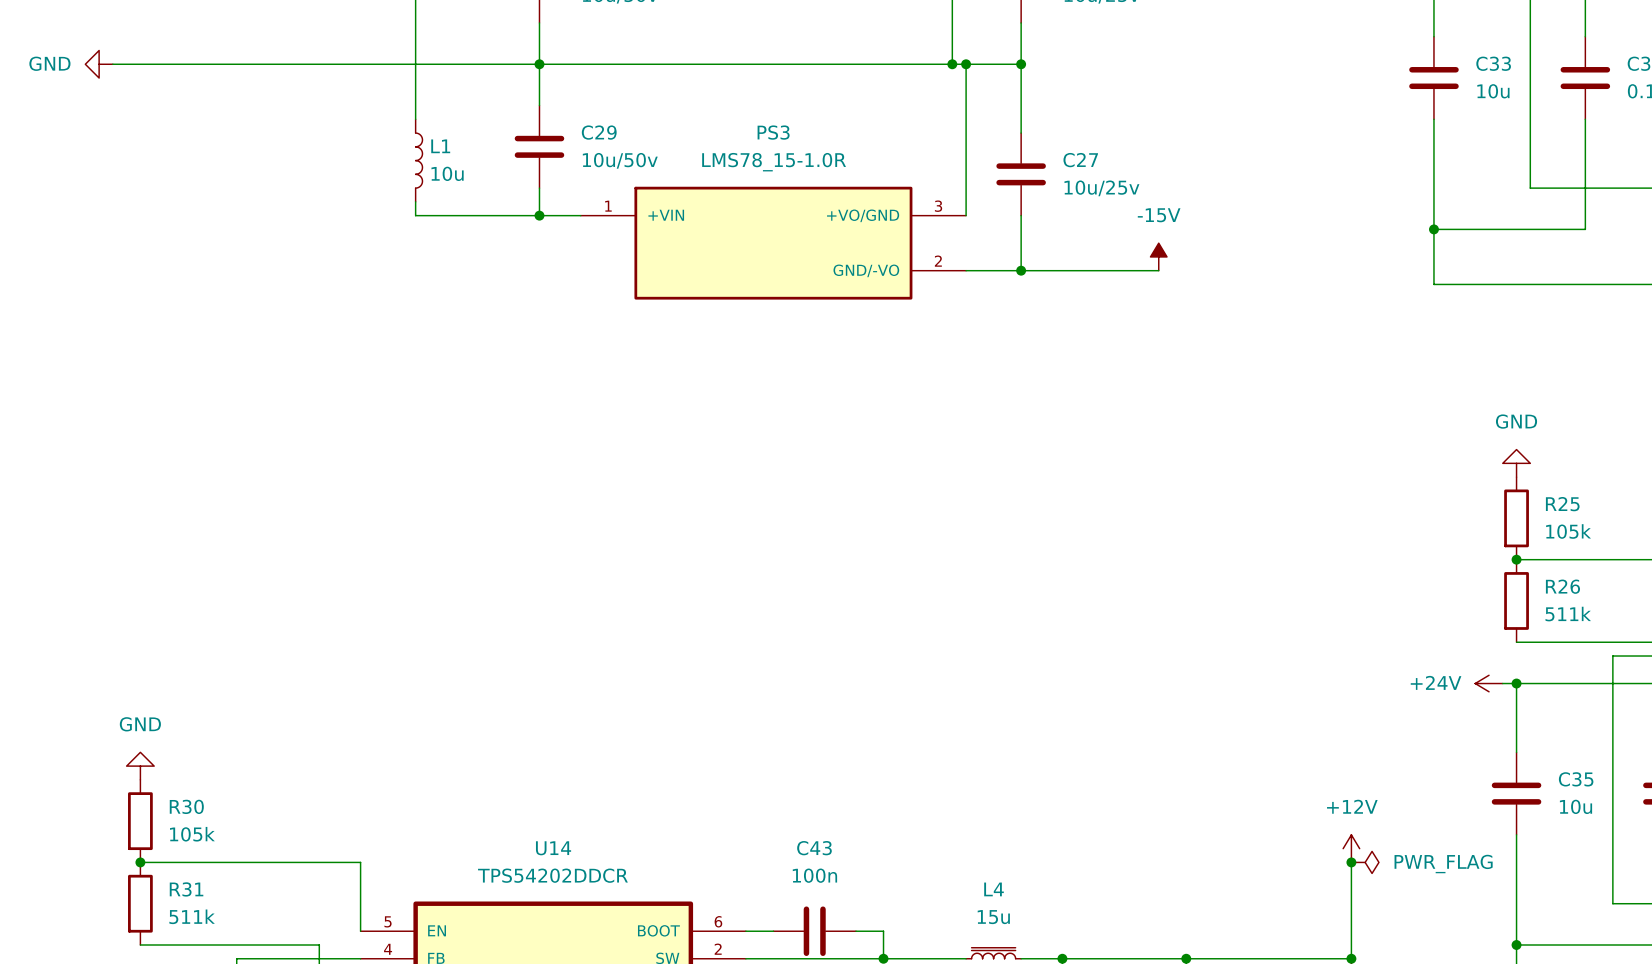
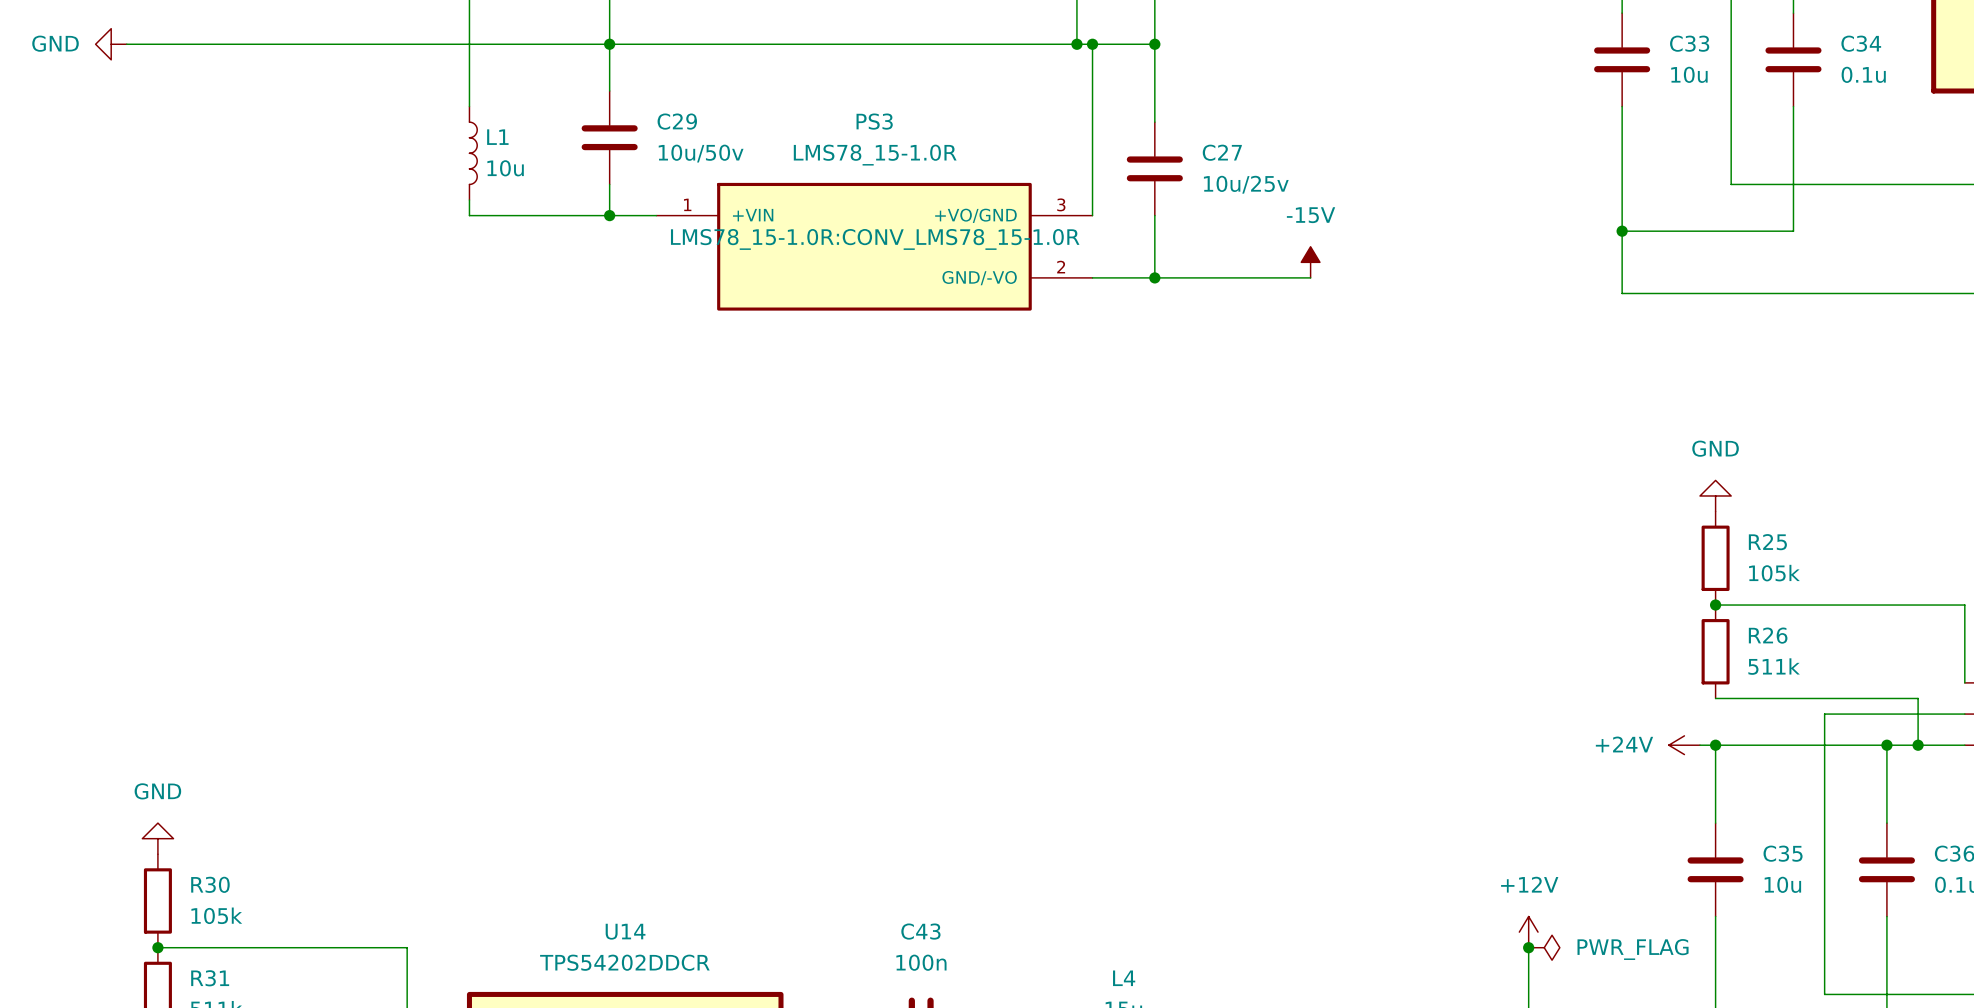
PS3 text: none -> LMS78_15-1.0R:CONV_LMS78_15-1.0R (875, 239)

